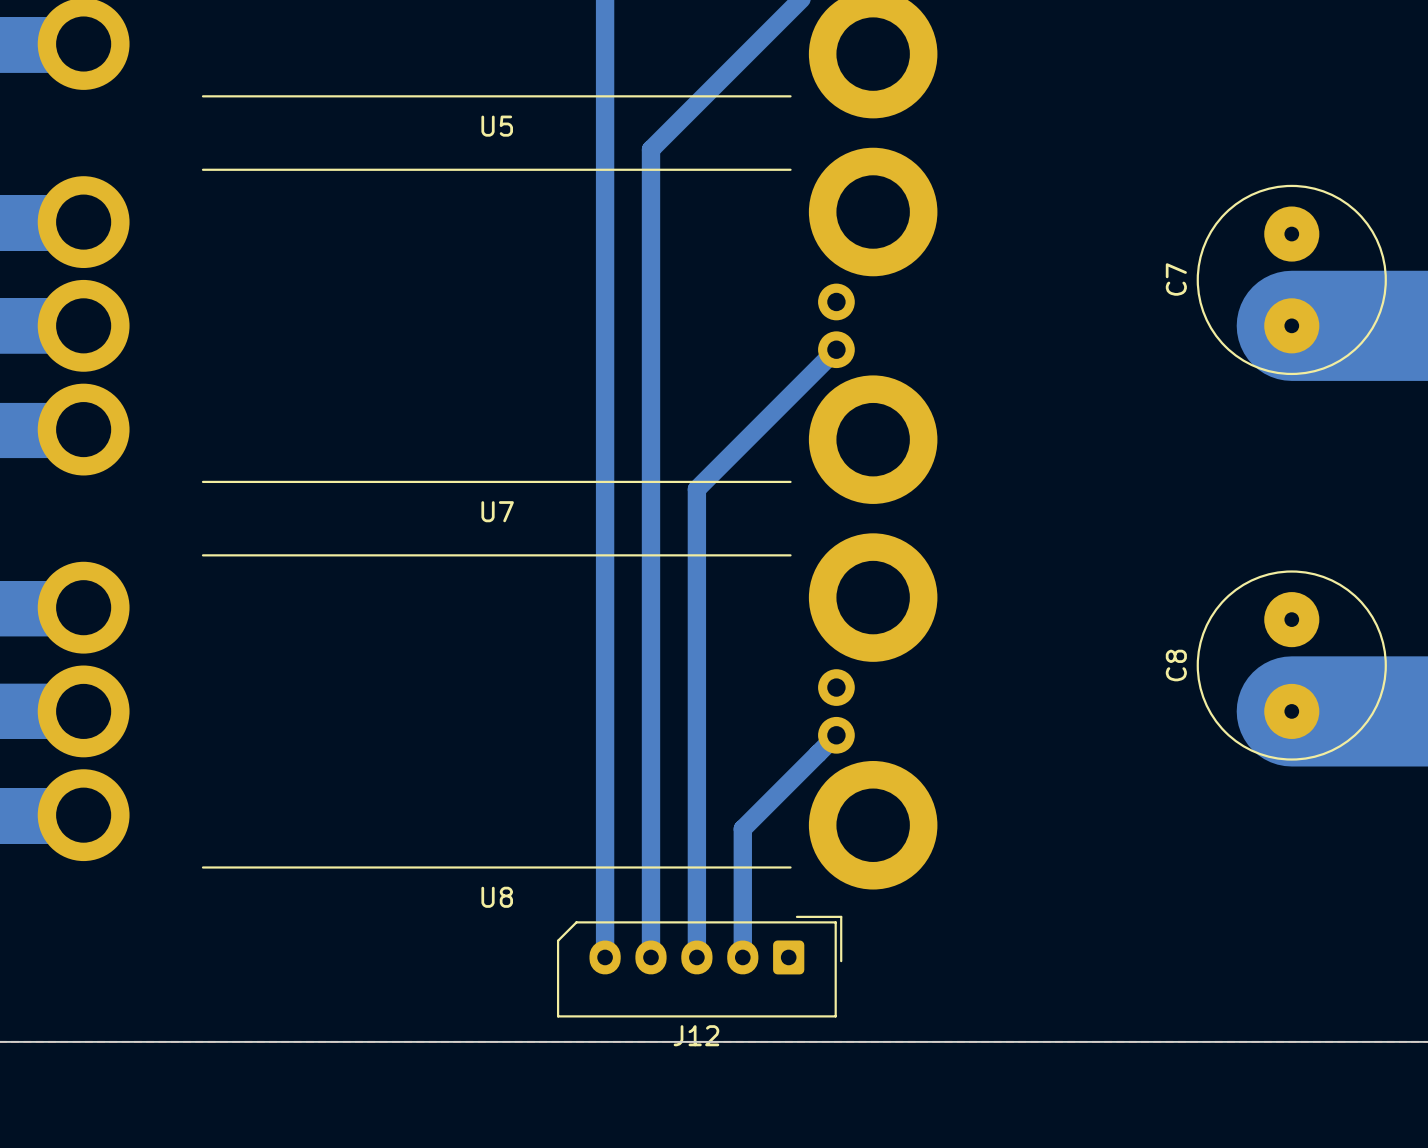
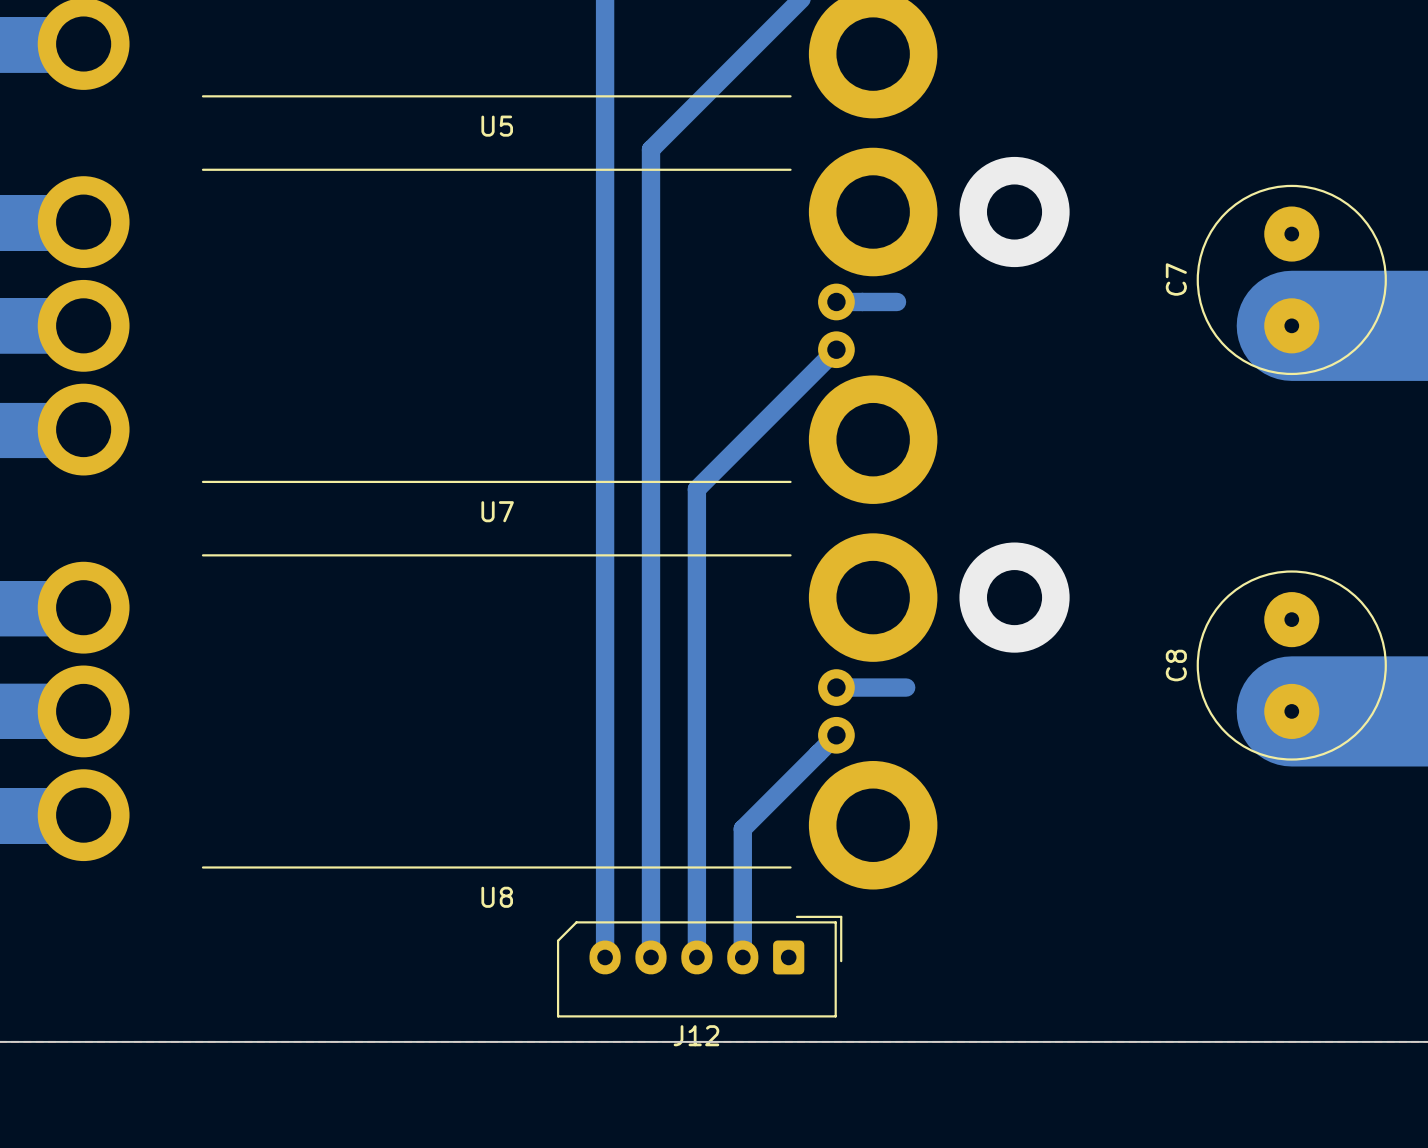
via: none -> (1014, 212)
bottom track: none -> (836, 301) (897, 301)
via: none -> (1014, 597)
bottom track: none -> (836, 687) (906, 687)

